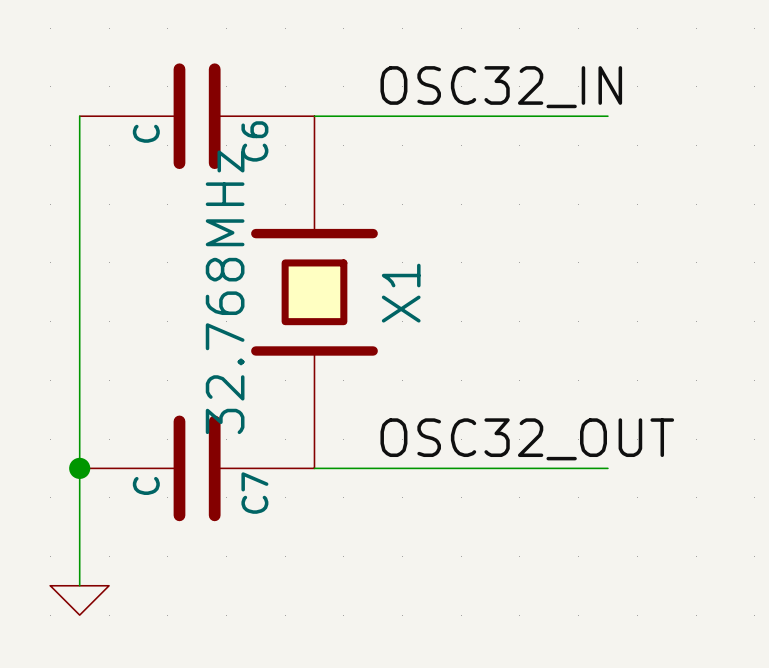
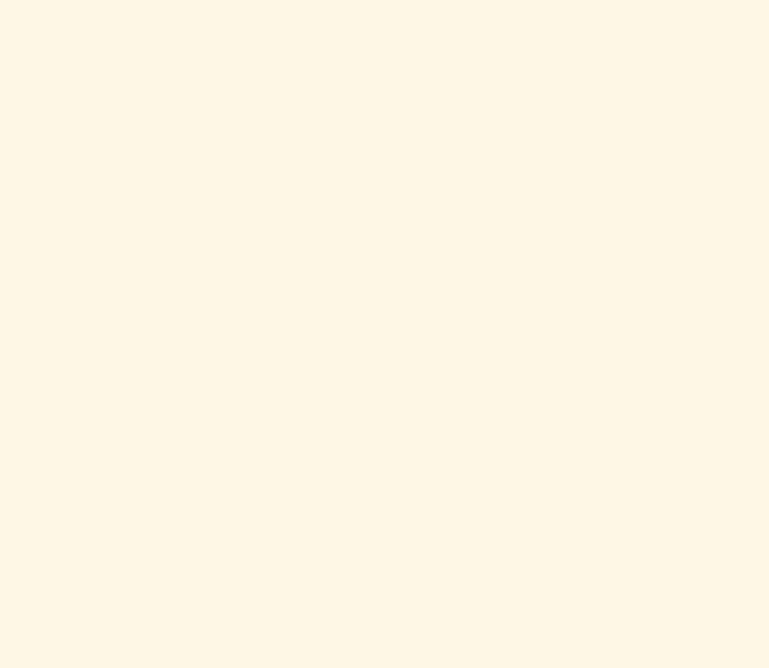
label: OSC32_IN (501, 87) -> none
wire: (79, 116) (79, 585) -> none
C6: C (197, 116) -> none
wire: (314, 116) (607, 116) -> none
X1: 32.768MHz (314, 292) -> none
label: OSC32_OUT (527, 439) -> none
junction: (79, 468) -> none
C7: C (197, 468) -> none
wire: (314, 468) (607, 468) -> none
power symbol: (79, 600) -> none

